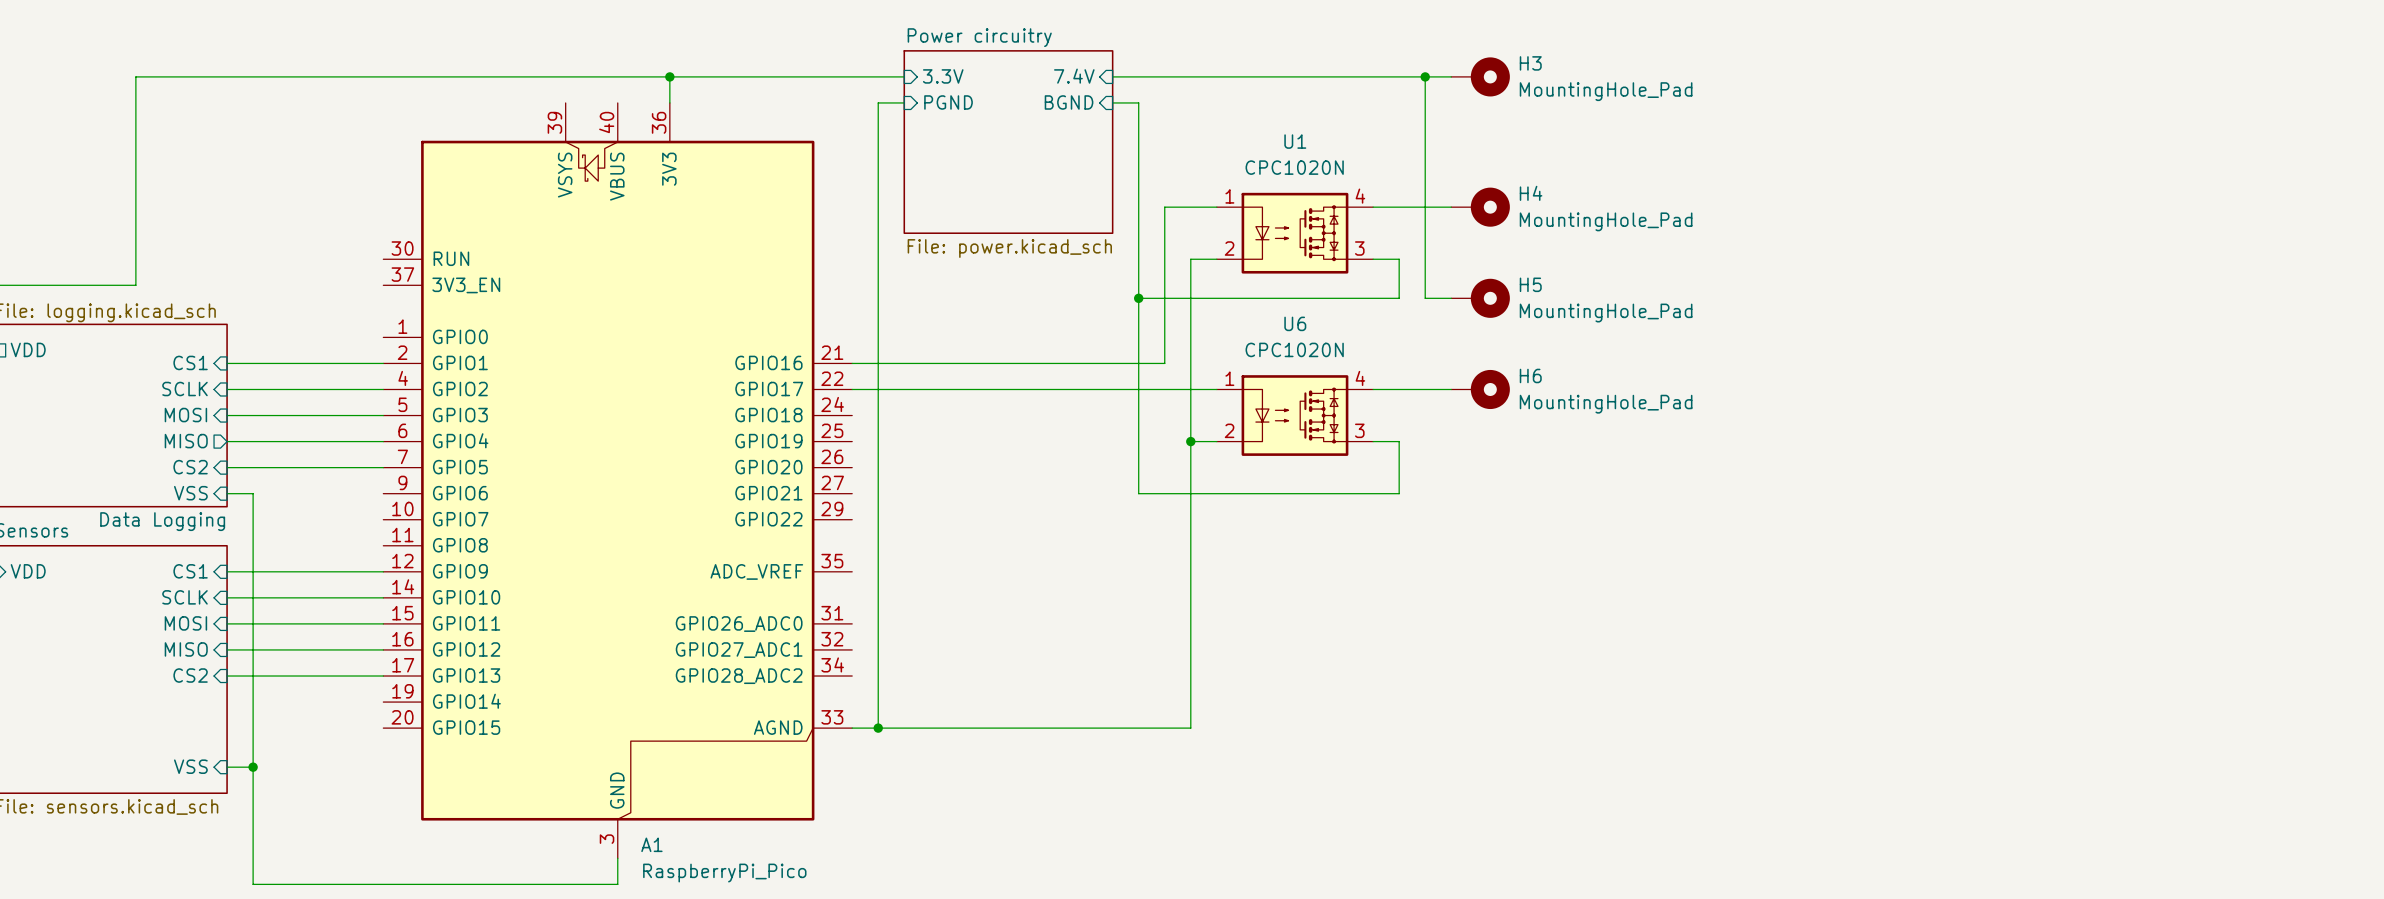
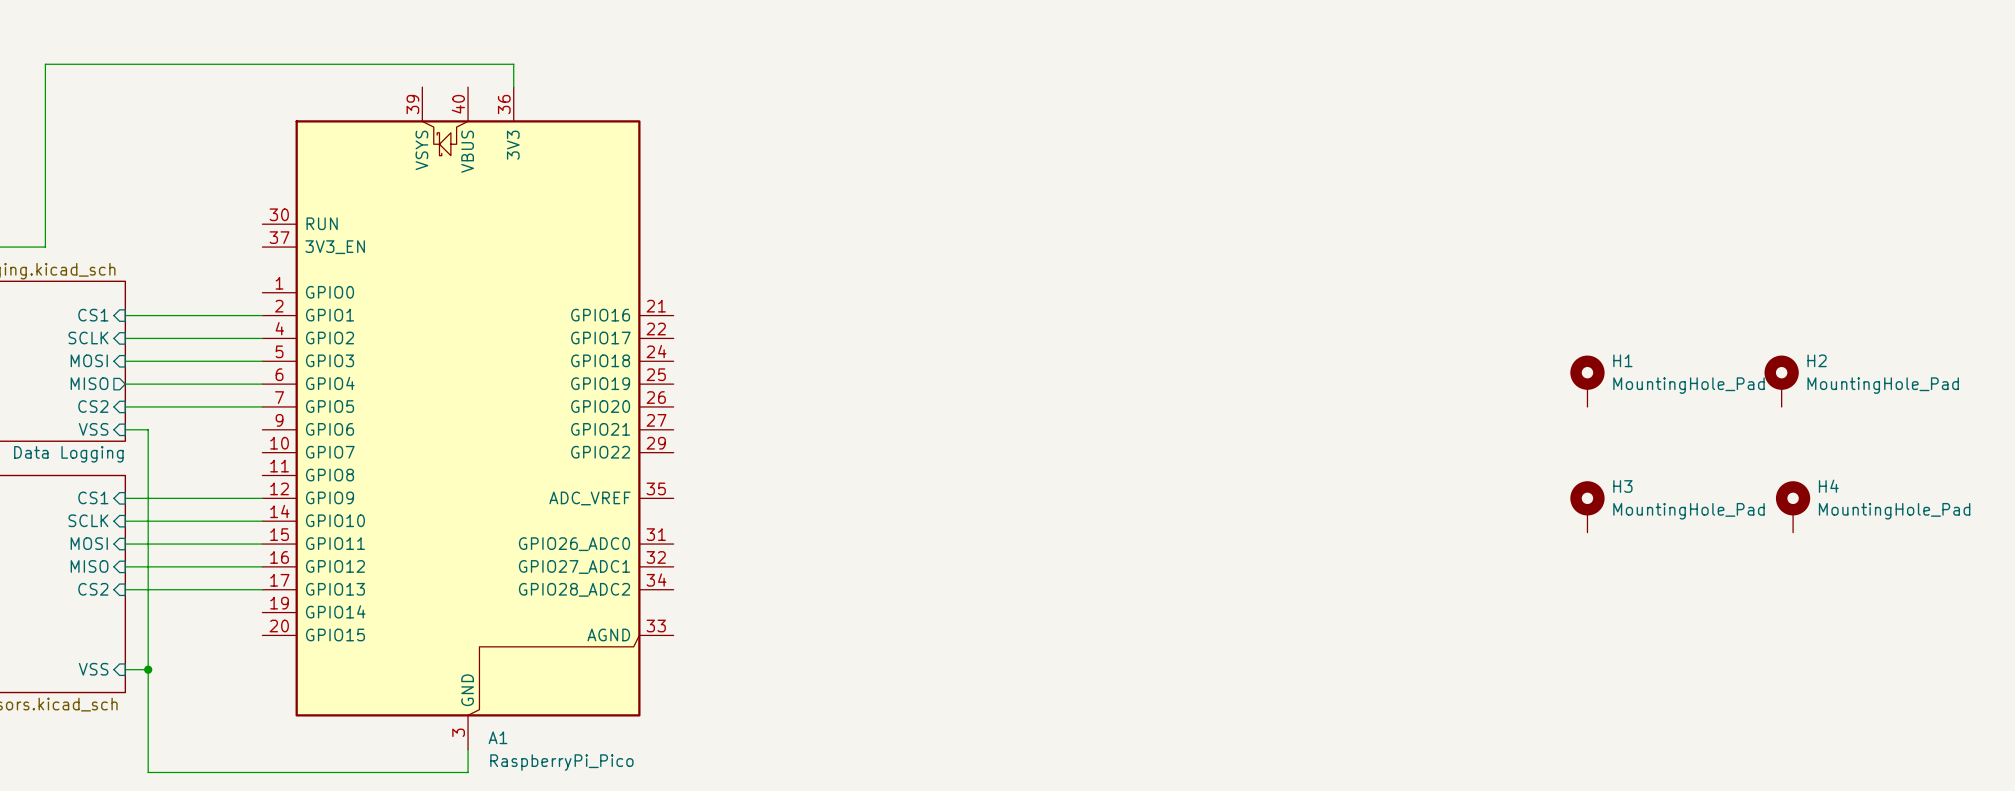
wire: (669, 76) (904, 76) -> none
junction: (669, 76) -> none
sheet pin: 3.3V (943, 76) -> none
sheet pin: 7.4V (1074, 76) -> none
wire: (1112, 76) (1451, 76) -> none
wire: (1425, 76) (1425, 298) (1451, 298) -> none
junction: (1425, 76) -> none
H3 position: (1480, 76) -> (1587, 506)
H3 rotation: 0° (1490, 76) -> 90° counterclockwise (1587, 498)
wire: (904, 102) (878, 102) (878, 728) -> none
sheet pin: PGND (948, 102) -> none
sheet pin: BGND (1069, 102) -> none
wire: (1112, 102) (1138, 102) (1138, 493) (1399, 493) (1399, 441) (1373, 441) -> none
sheet Power circuitry: File: power.kicad_sch (1008, 142) -> none
wire: (1216, 207) (1164, 207) (1164, 363) (852, 363) -> none
wire: (1373, 207) (1451, 207) -> none
H4 position: (1480, 207) -> (1793, 506)
H4 rotation: 0° (1490, 207) -> 90° counterclockwise (1793, 498)
U1: CPC1020N (1294, 233) -> none
wire: (1216, 259) (1190, 259) (1190, 728) (852, 728) -> none
wire: (1373, 259) (1399, 259) (1399, 298) (1138, 298) -> none
junction: (1138, 298) -> none
H5: MountingHole_Pad (1480, 298) -> none
wire: (852, 389) (1216, 389) -> none
wire: (1373, 389) (1451, 389) -> none
H6: MountingHole_Pad (1480, 389) -> none
U6: CPC1020N (1294, 415) -> none
H1: none -> MountingHole_Pad (1587, 381)
H2: none -> MountingHole_Pad (1781, 381)
wire: (1190, 441) (1216, 441) -> none
junction: (1190, 441) -> none
junction: (878, 728) -> none

